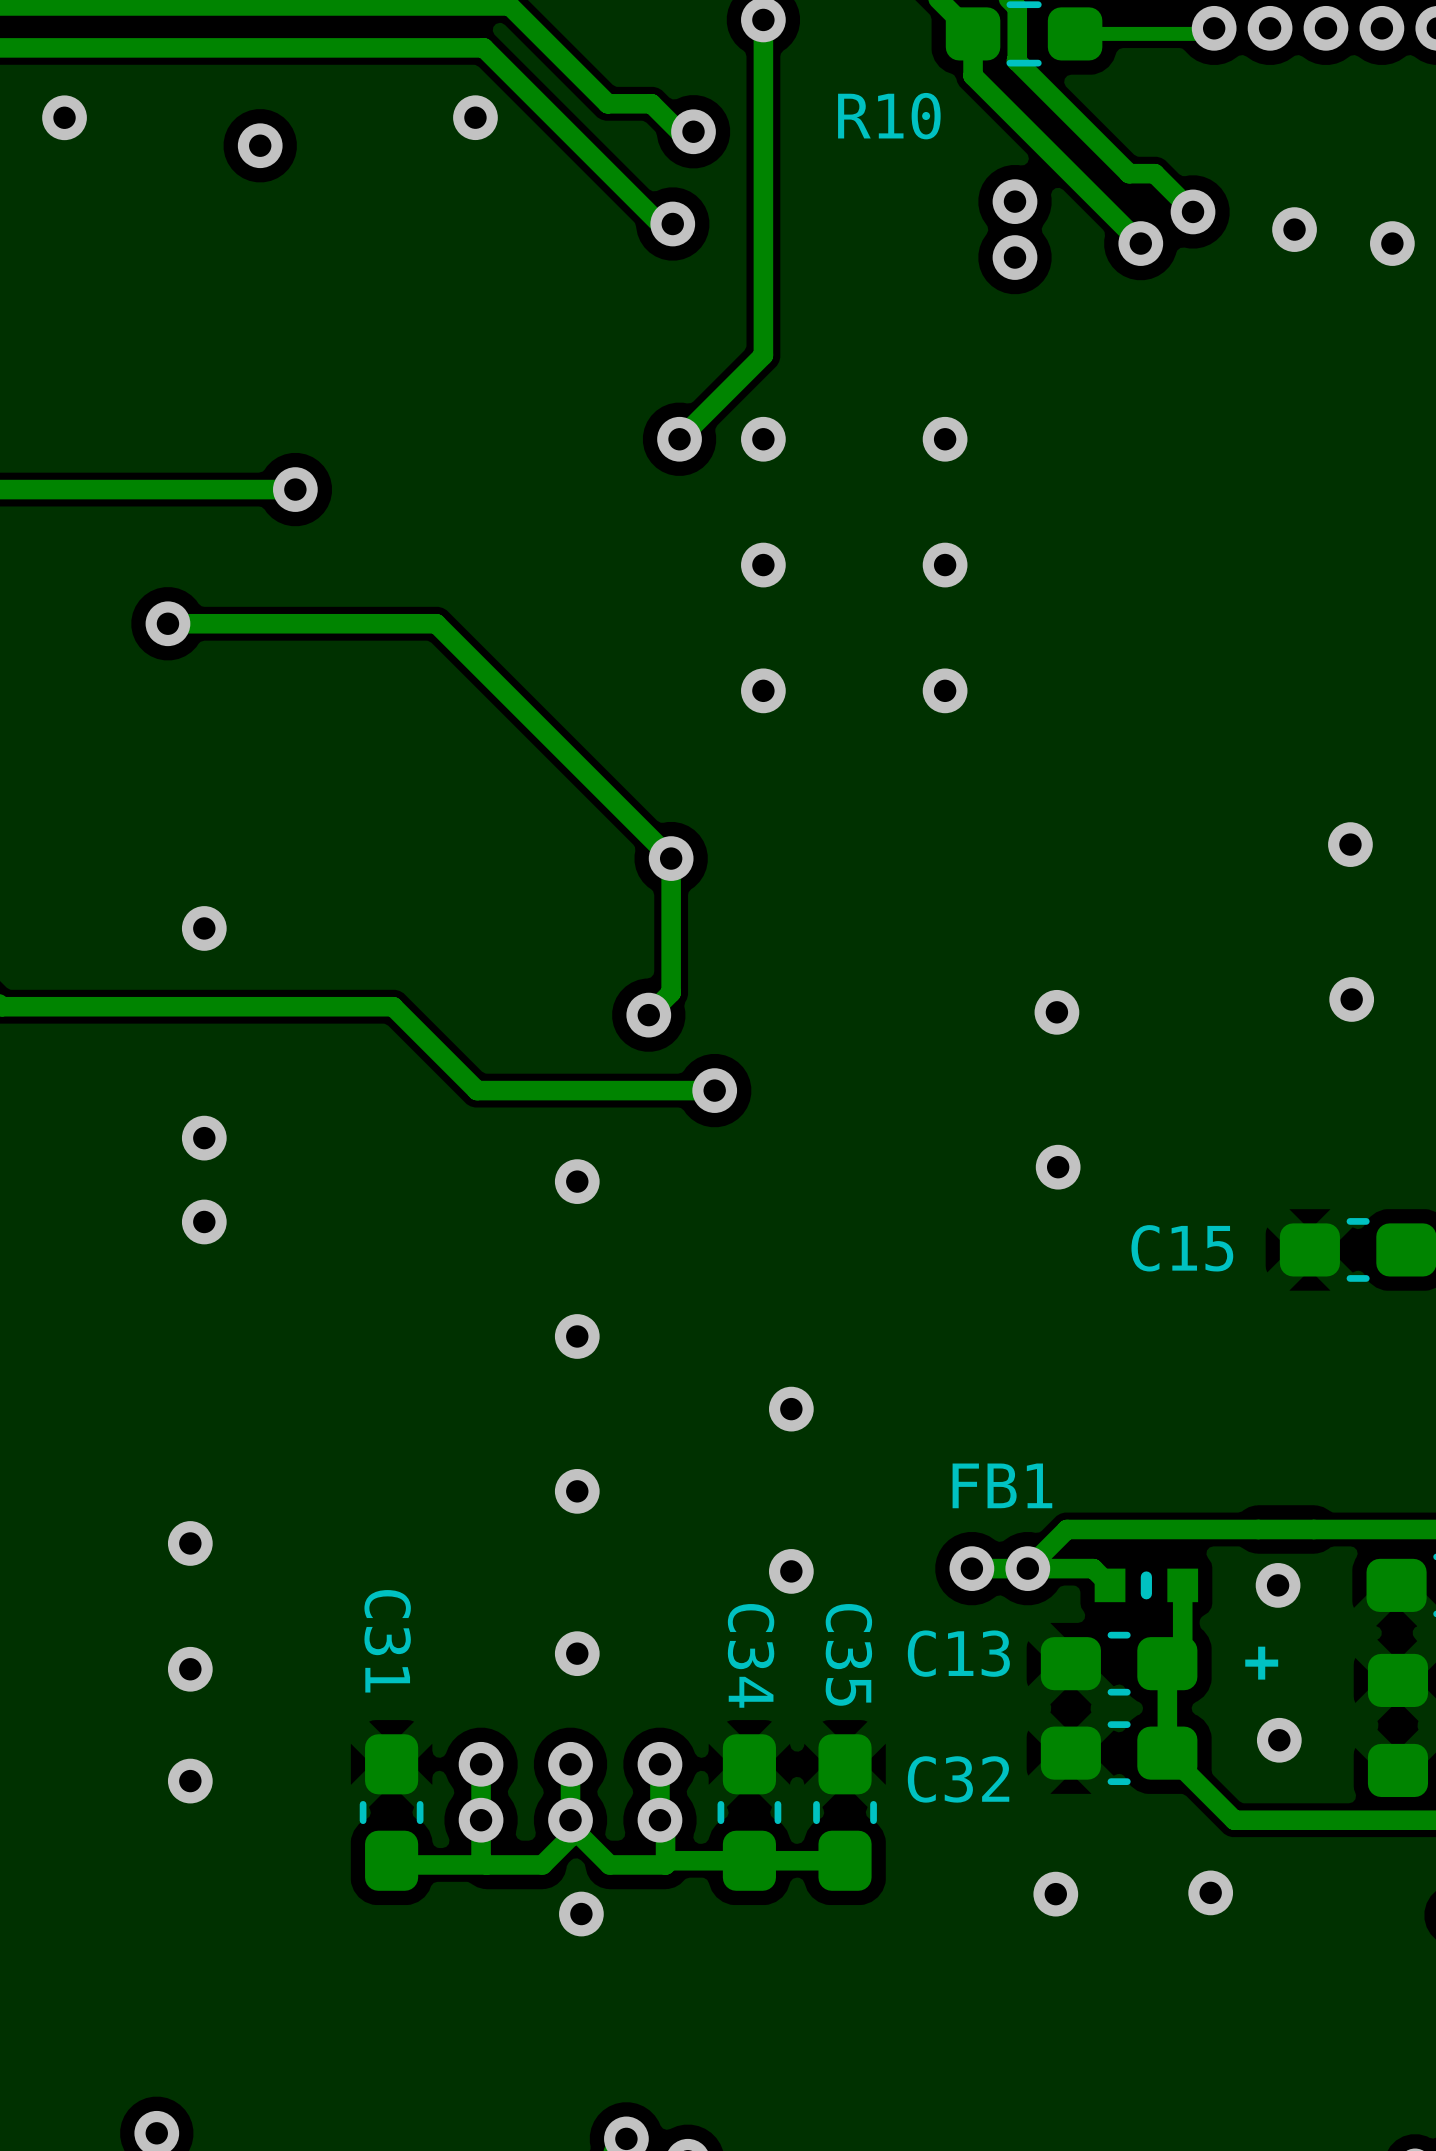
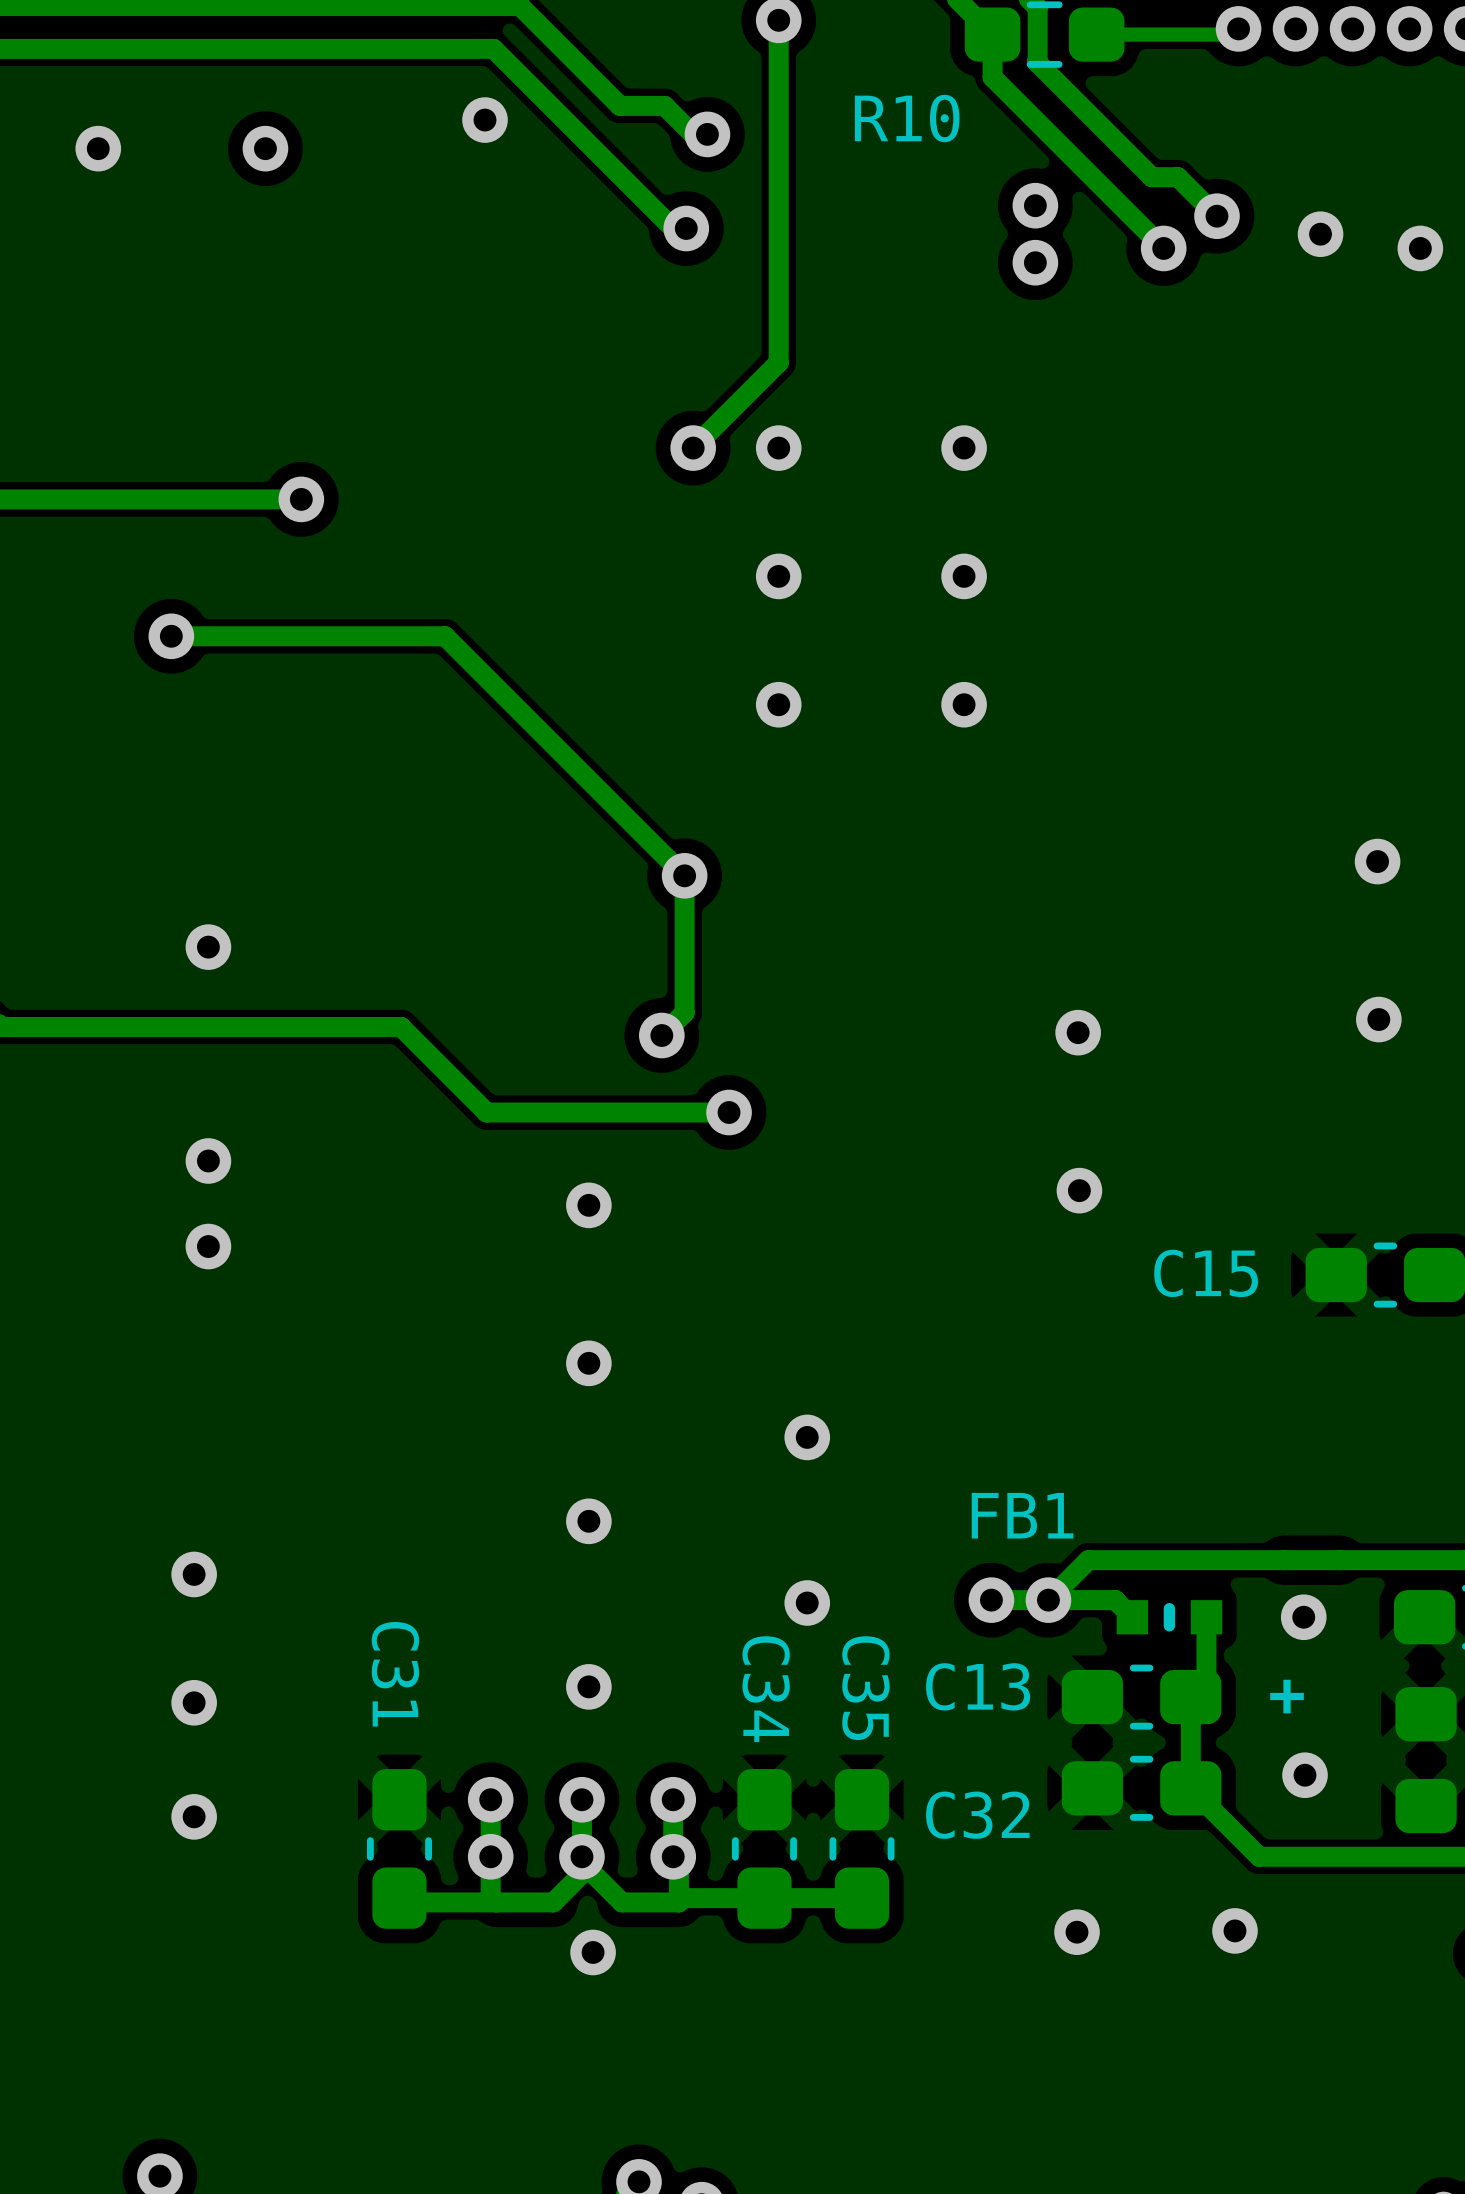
via position: (64, 117) -> (98, 148)

